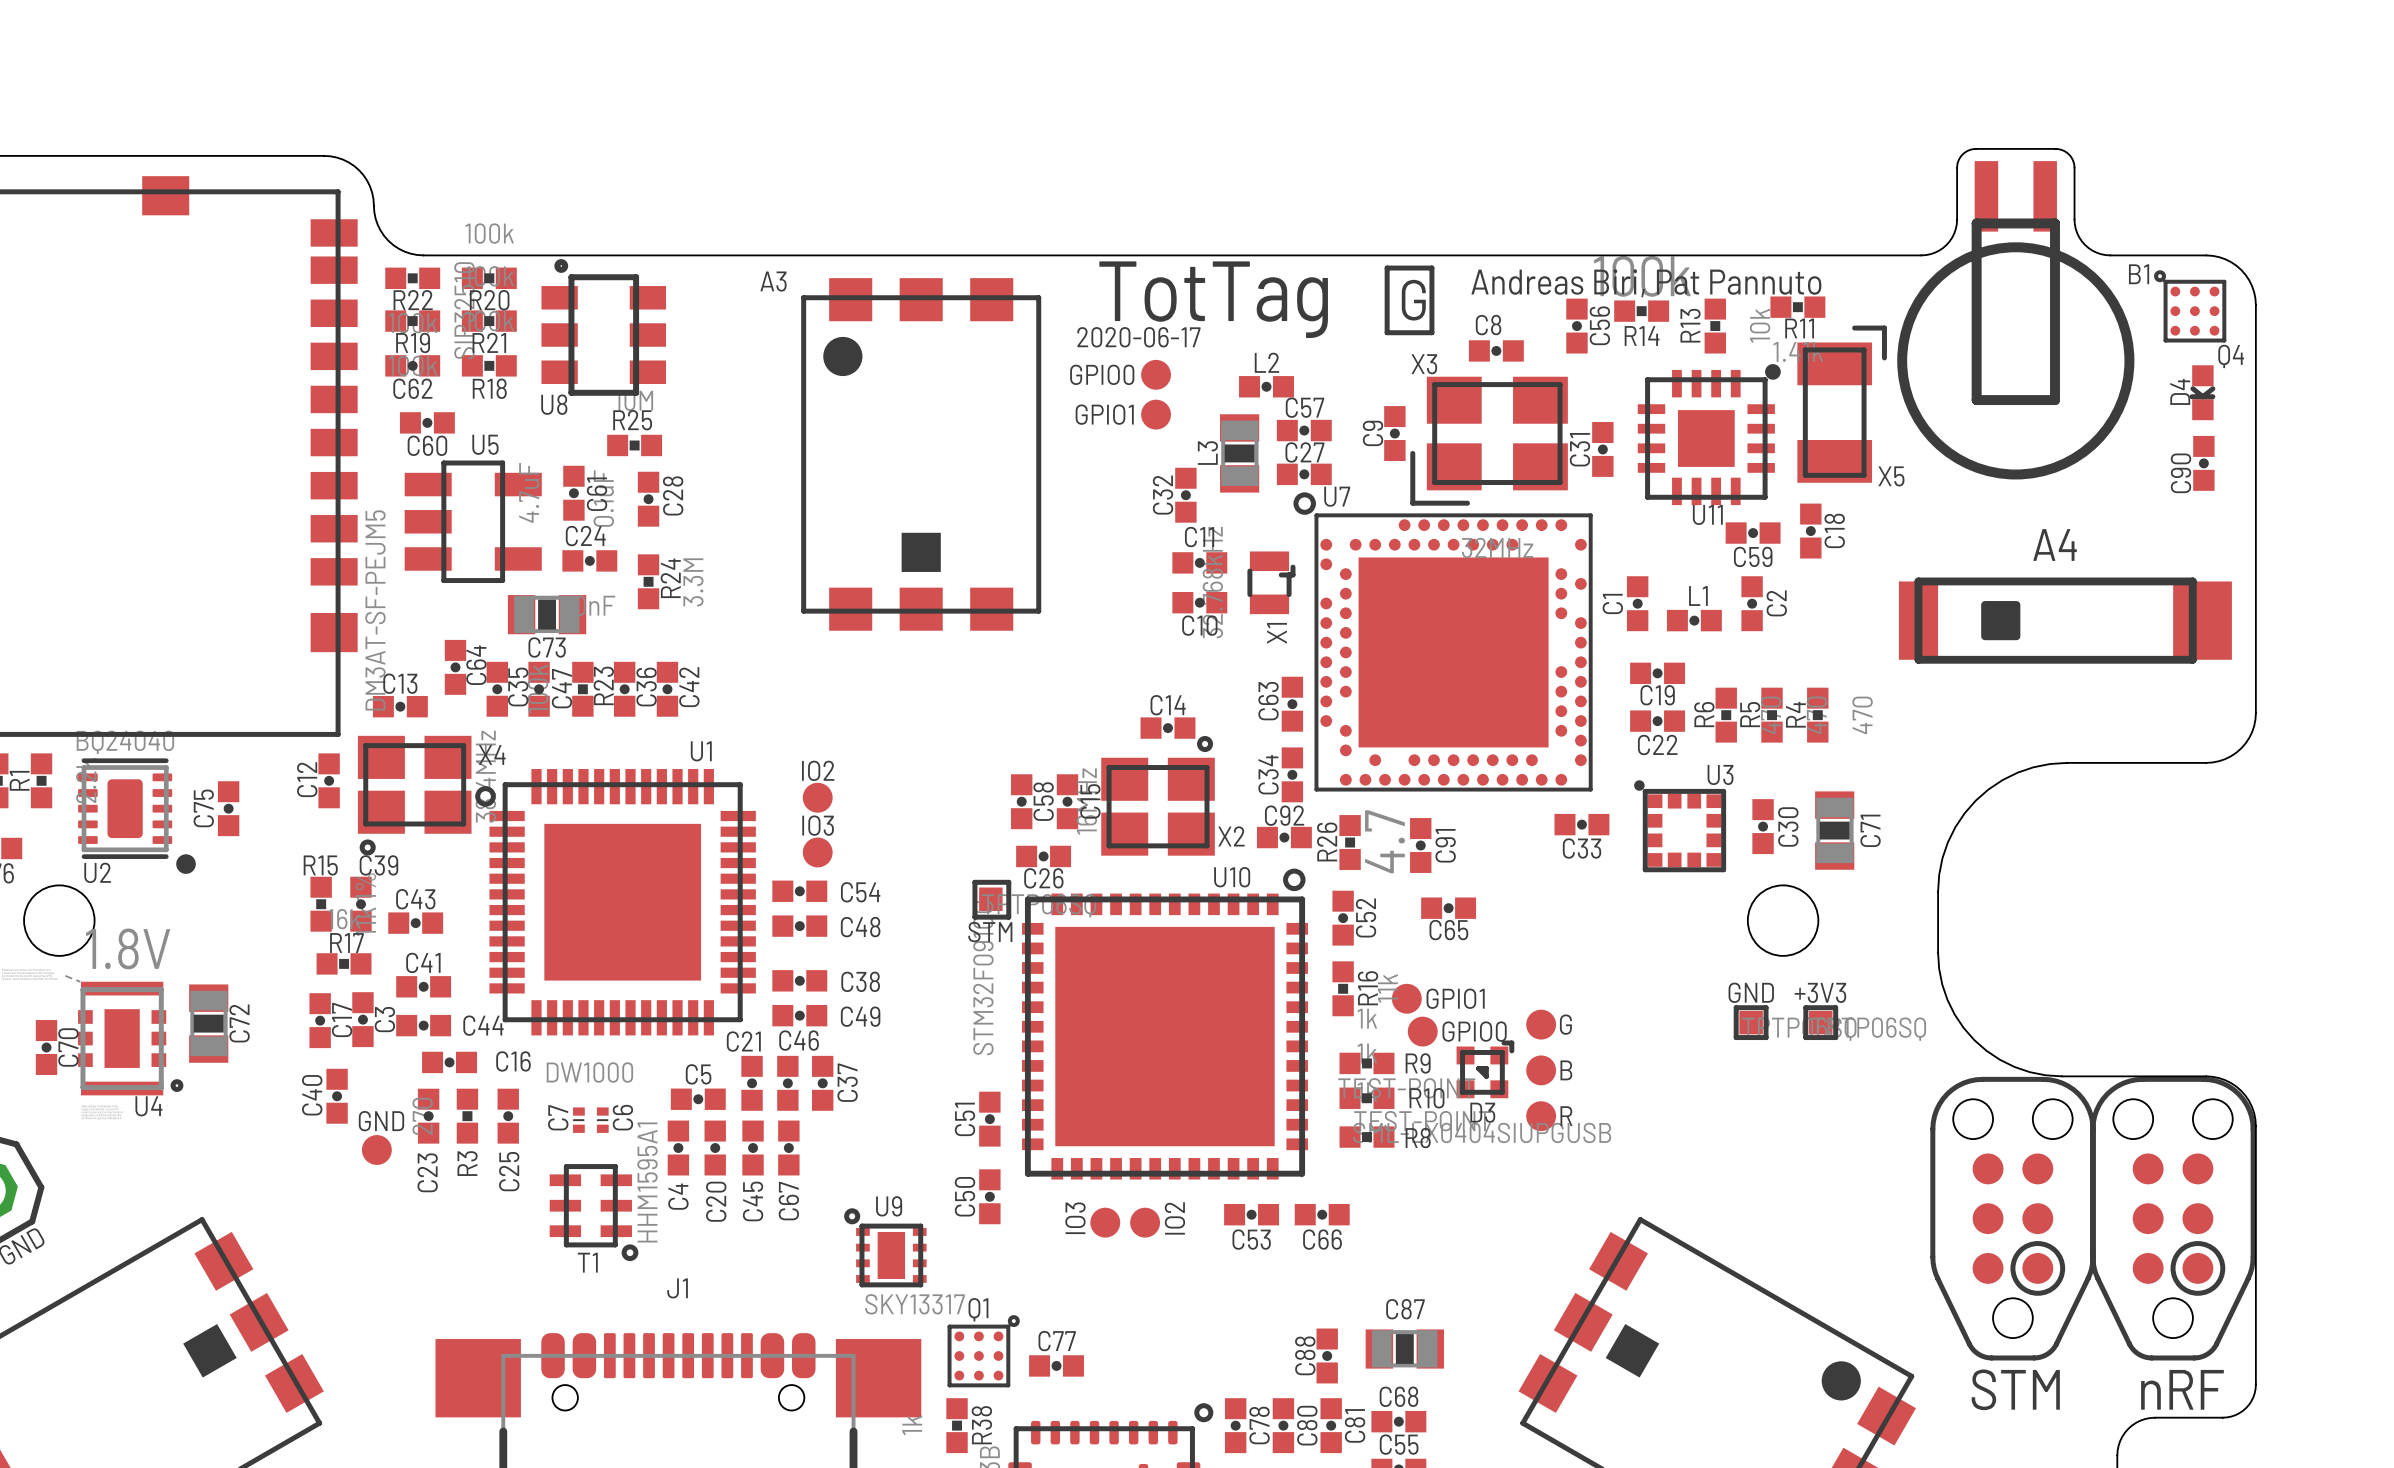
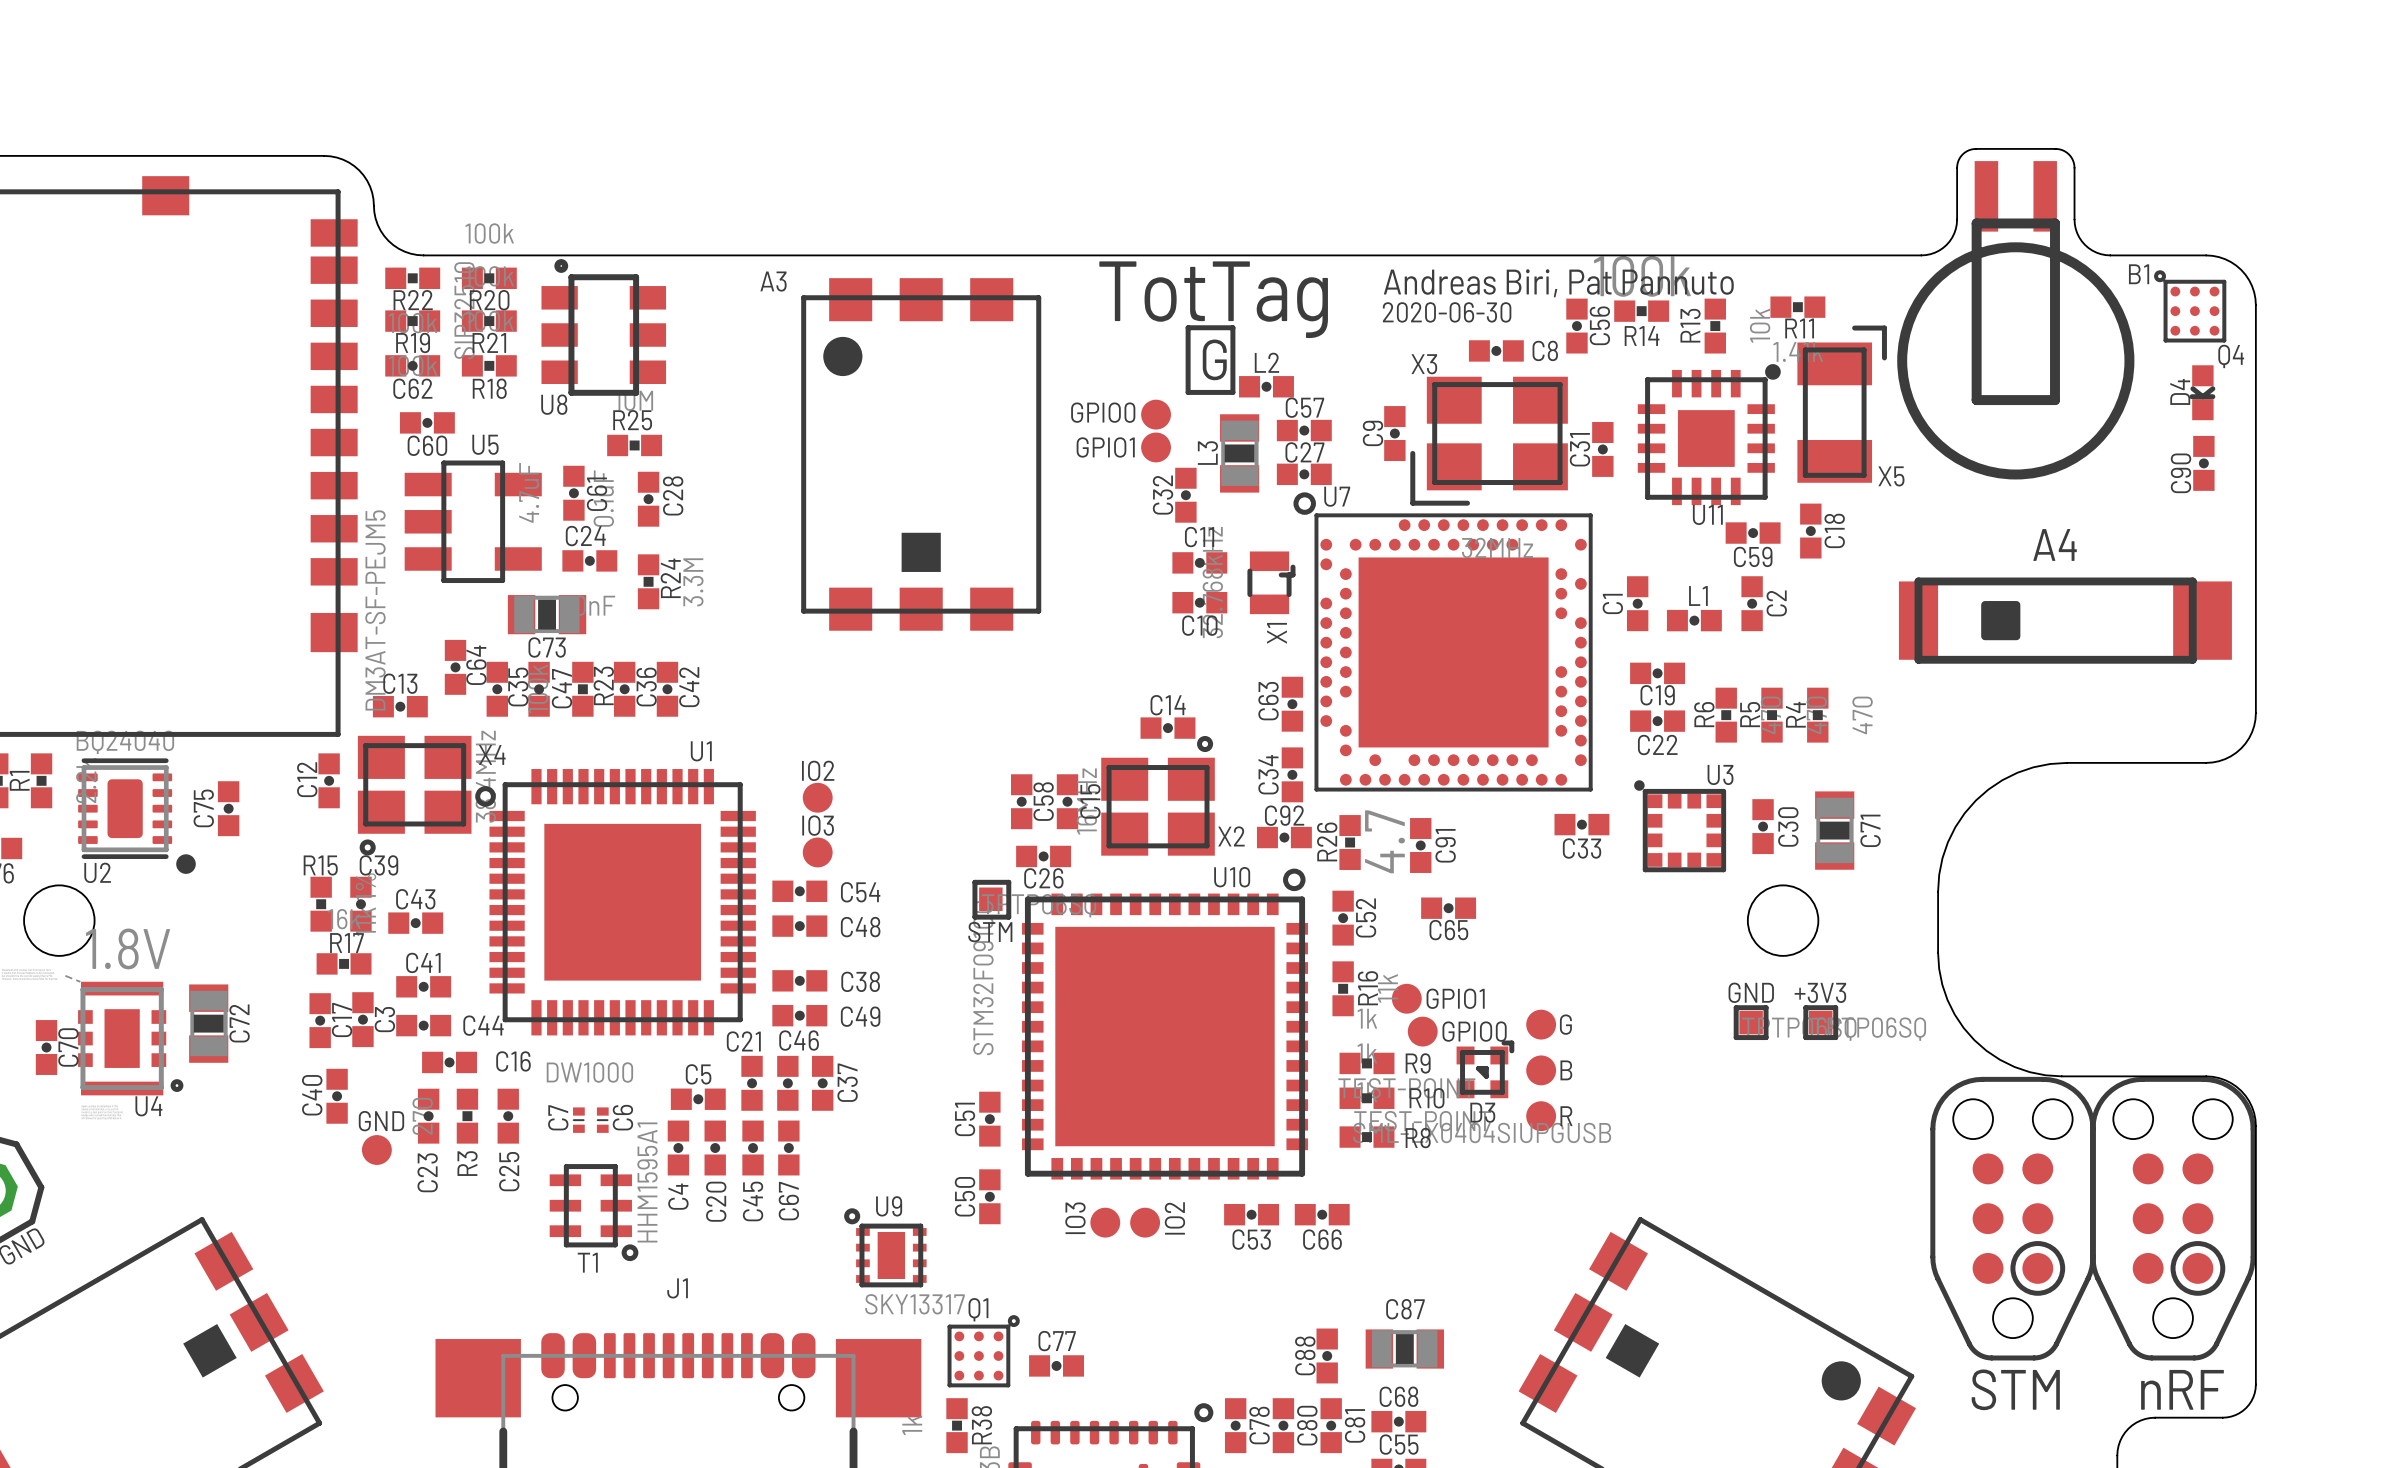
line: (1387, 268) (1431, 268) (1431, 332) (1387, 332) (1387, 268) -> (1188, 327) (1232, 327) (1232, 392) (1188, 392) (1188, 327)
text position: Andreas Biri, Pat Pannuto (1646, 283) -> Andreas Biri, Pat Pannuto (1558, 283)
text position: G (1413, 300) -> G (1214, 359)
text: none -> 2020-06-30 (1447, 312)
C8 name position: C8 (1488, 325) -> C8 (1545, 350)
text: 2020-06-17 (1138, 337) -> none
text position: GPIO0 (1102, 374) -> GPIO0 (1103, 412)
part position: (1156, 374) -> (1156, 447)
text position: GPIO1 (1104, 414) -> GPIO1 (1105, 447)

